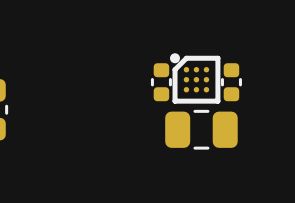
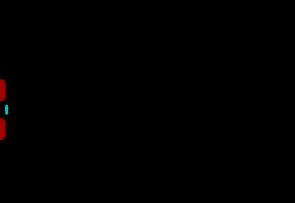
part: (195, 78) -> none
part: (161, 82) -> none
part: (231, 82) -> none
part: (201, 129) -> none

